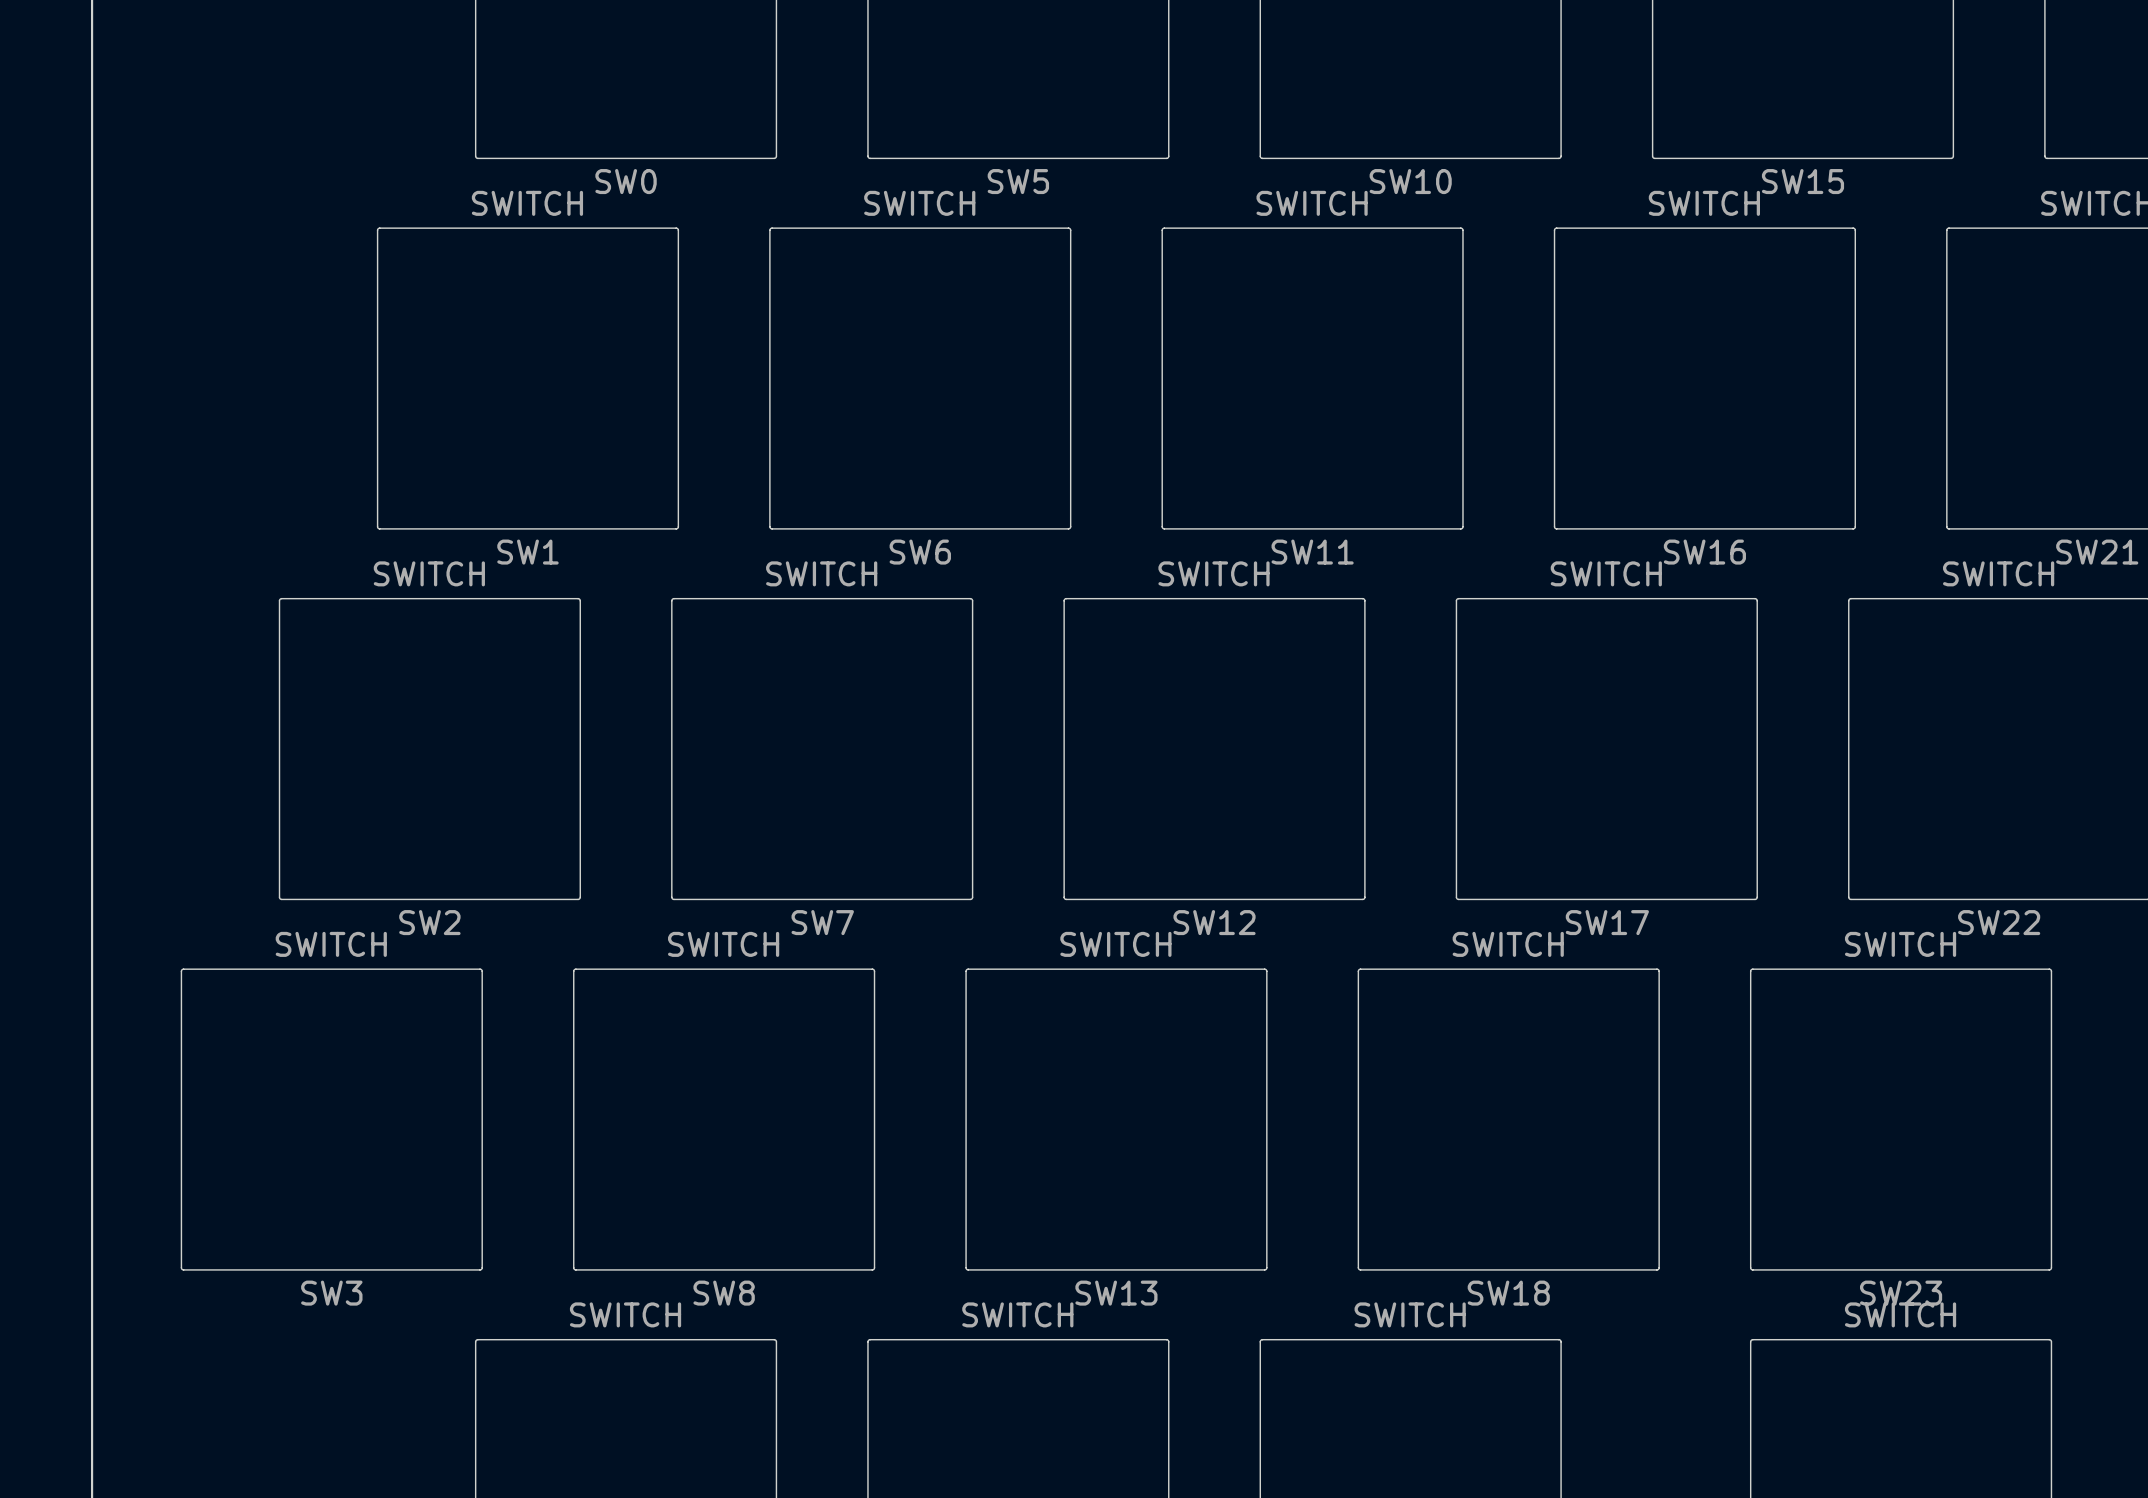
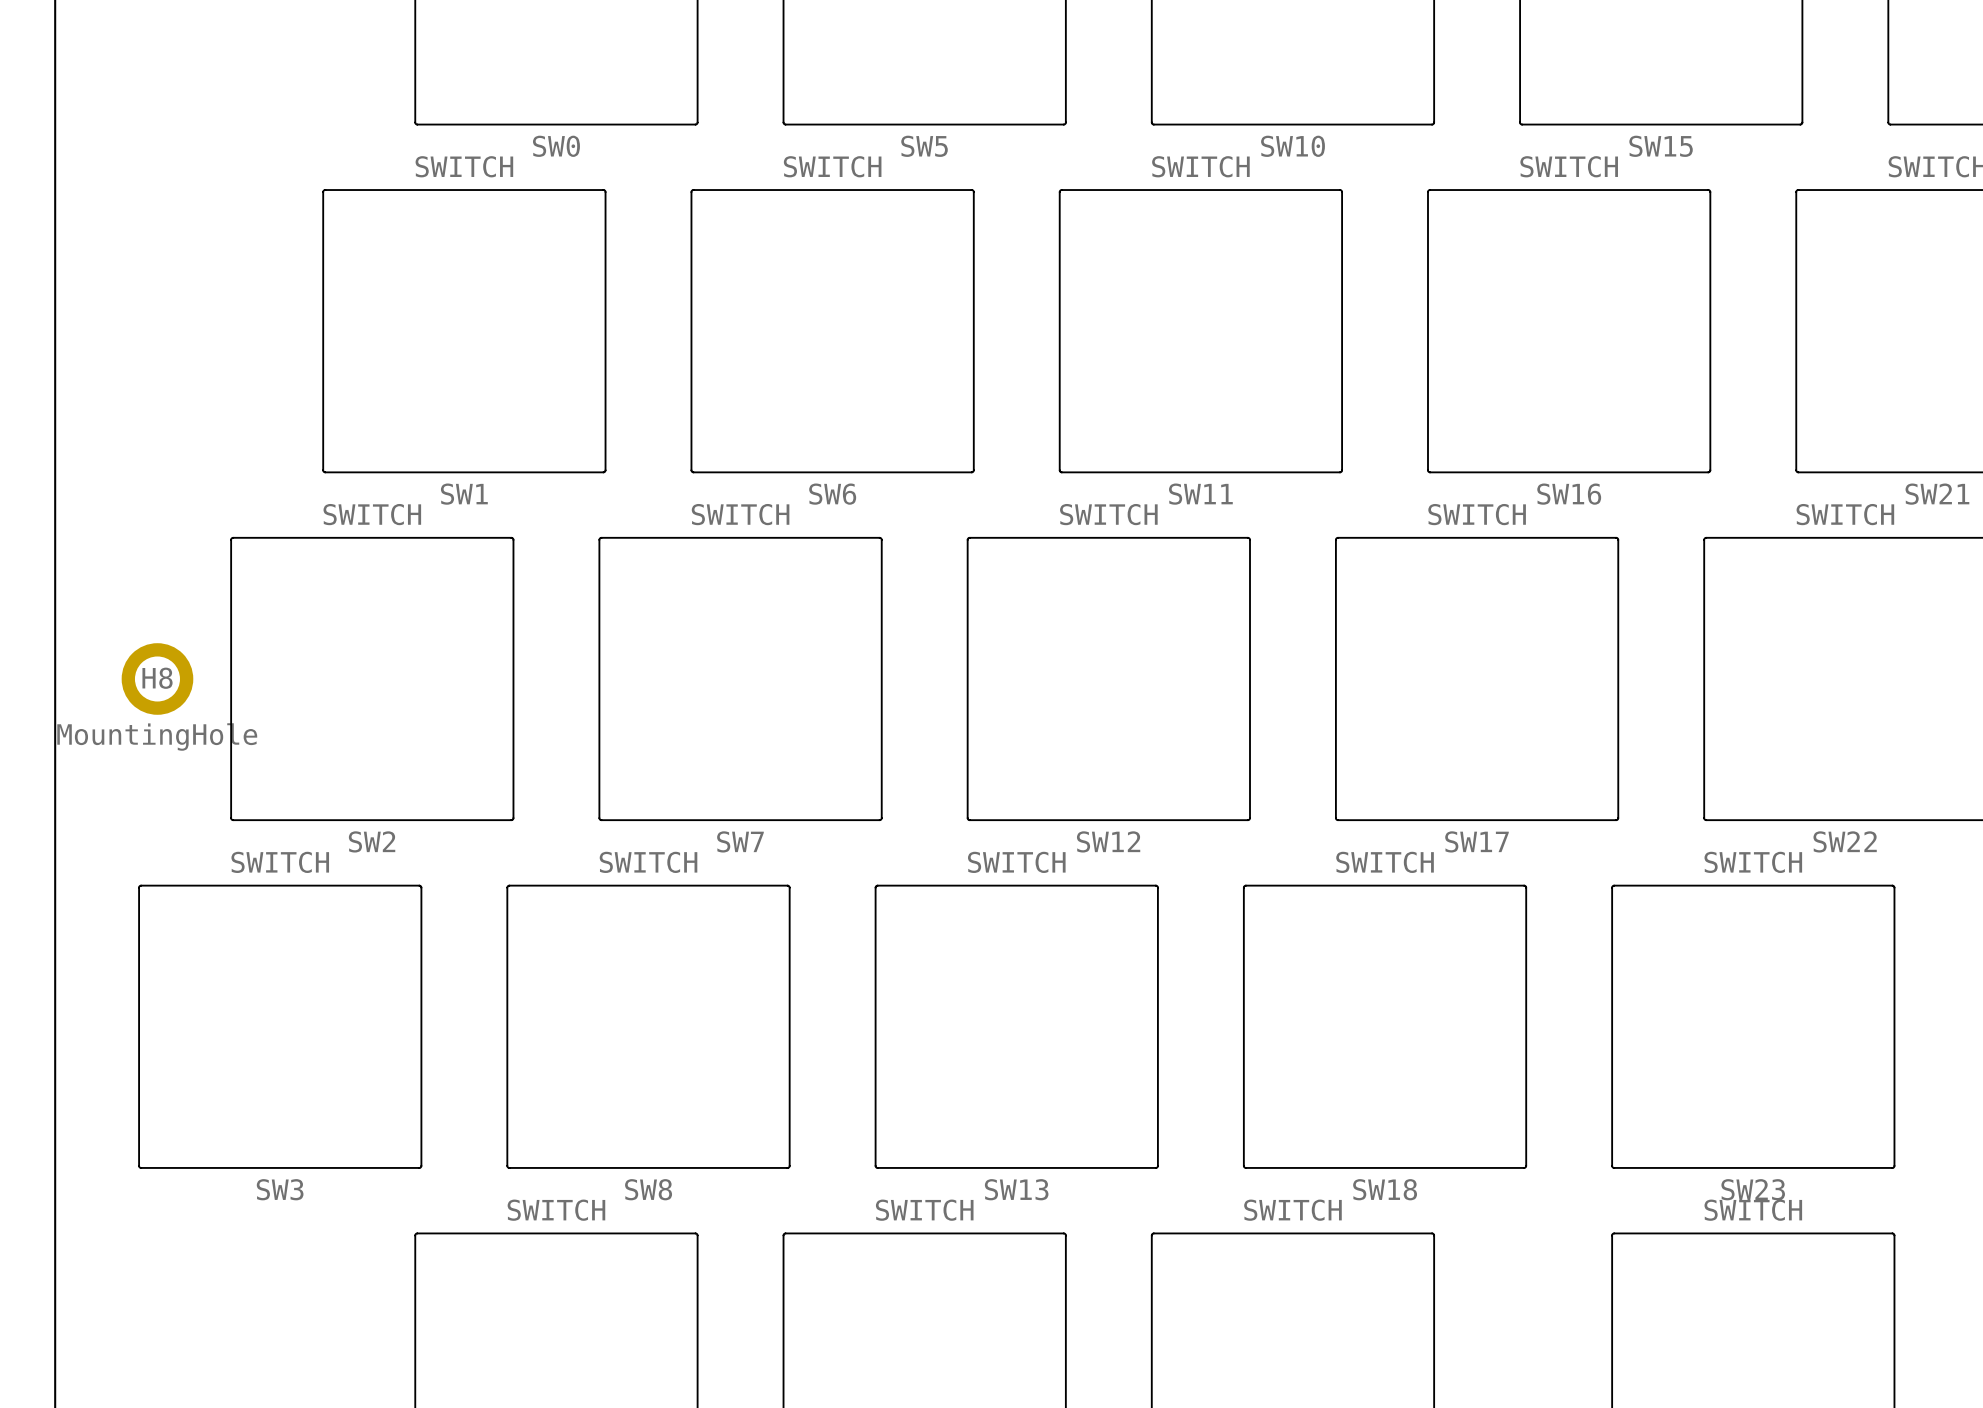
H8: none -> MountingHole (157, 678)

